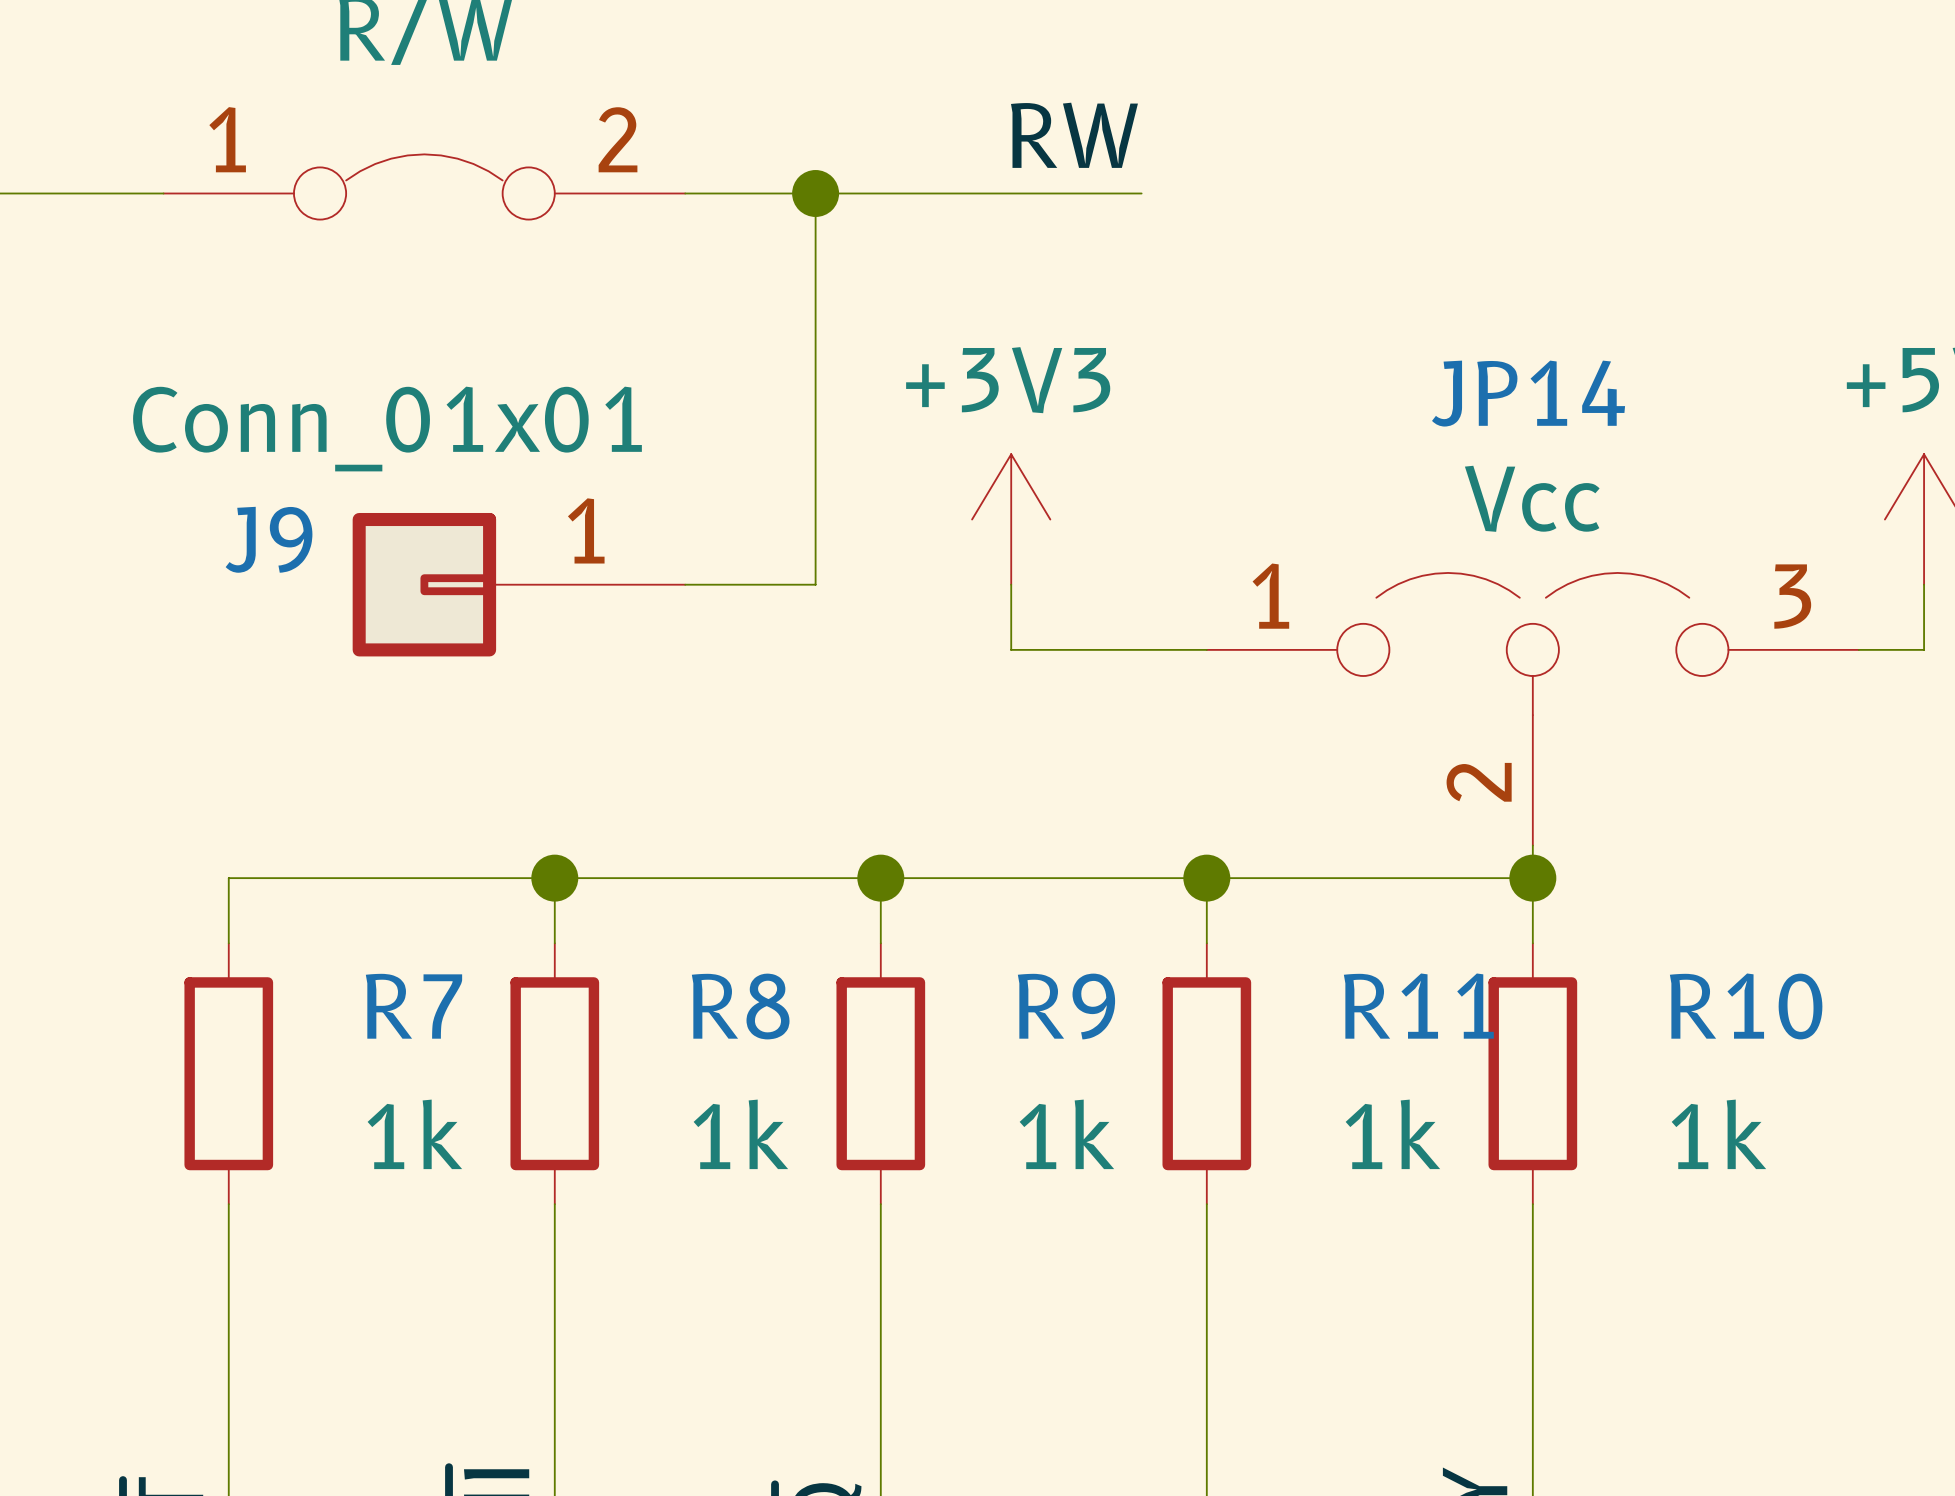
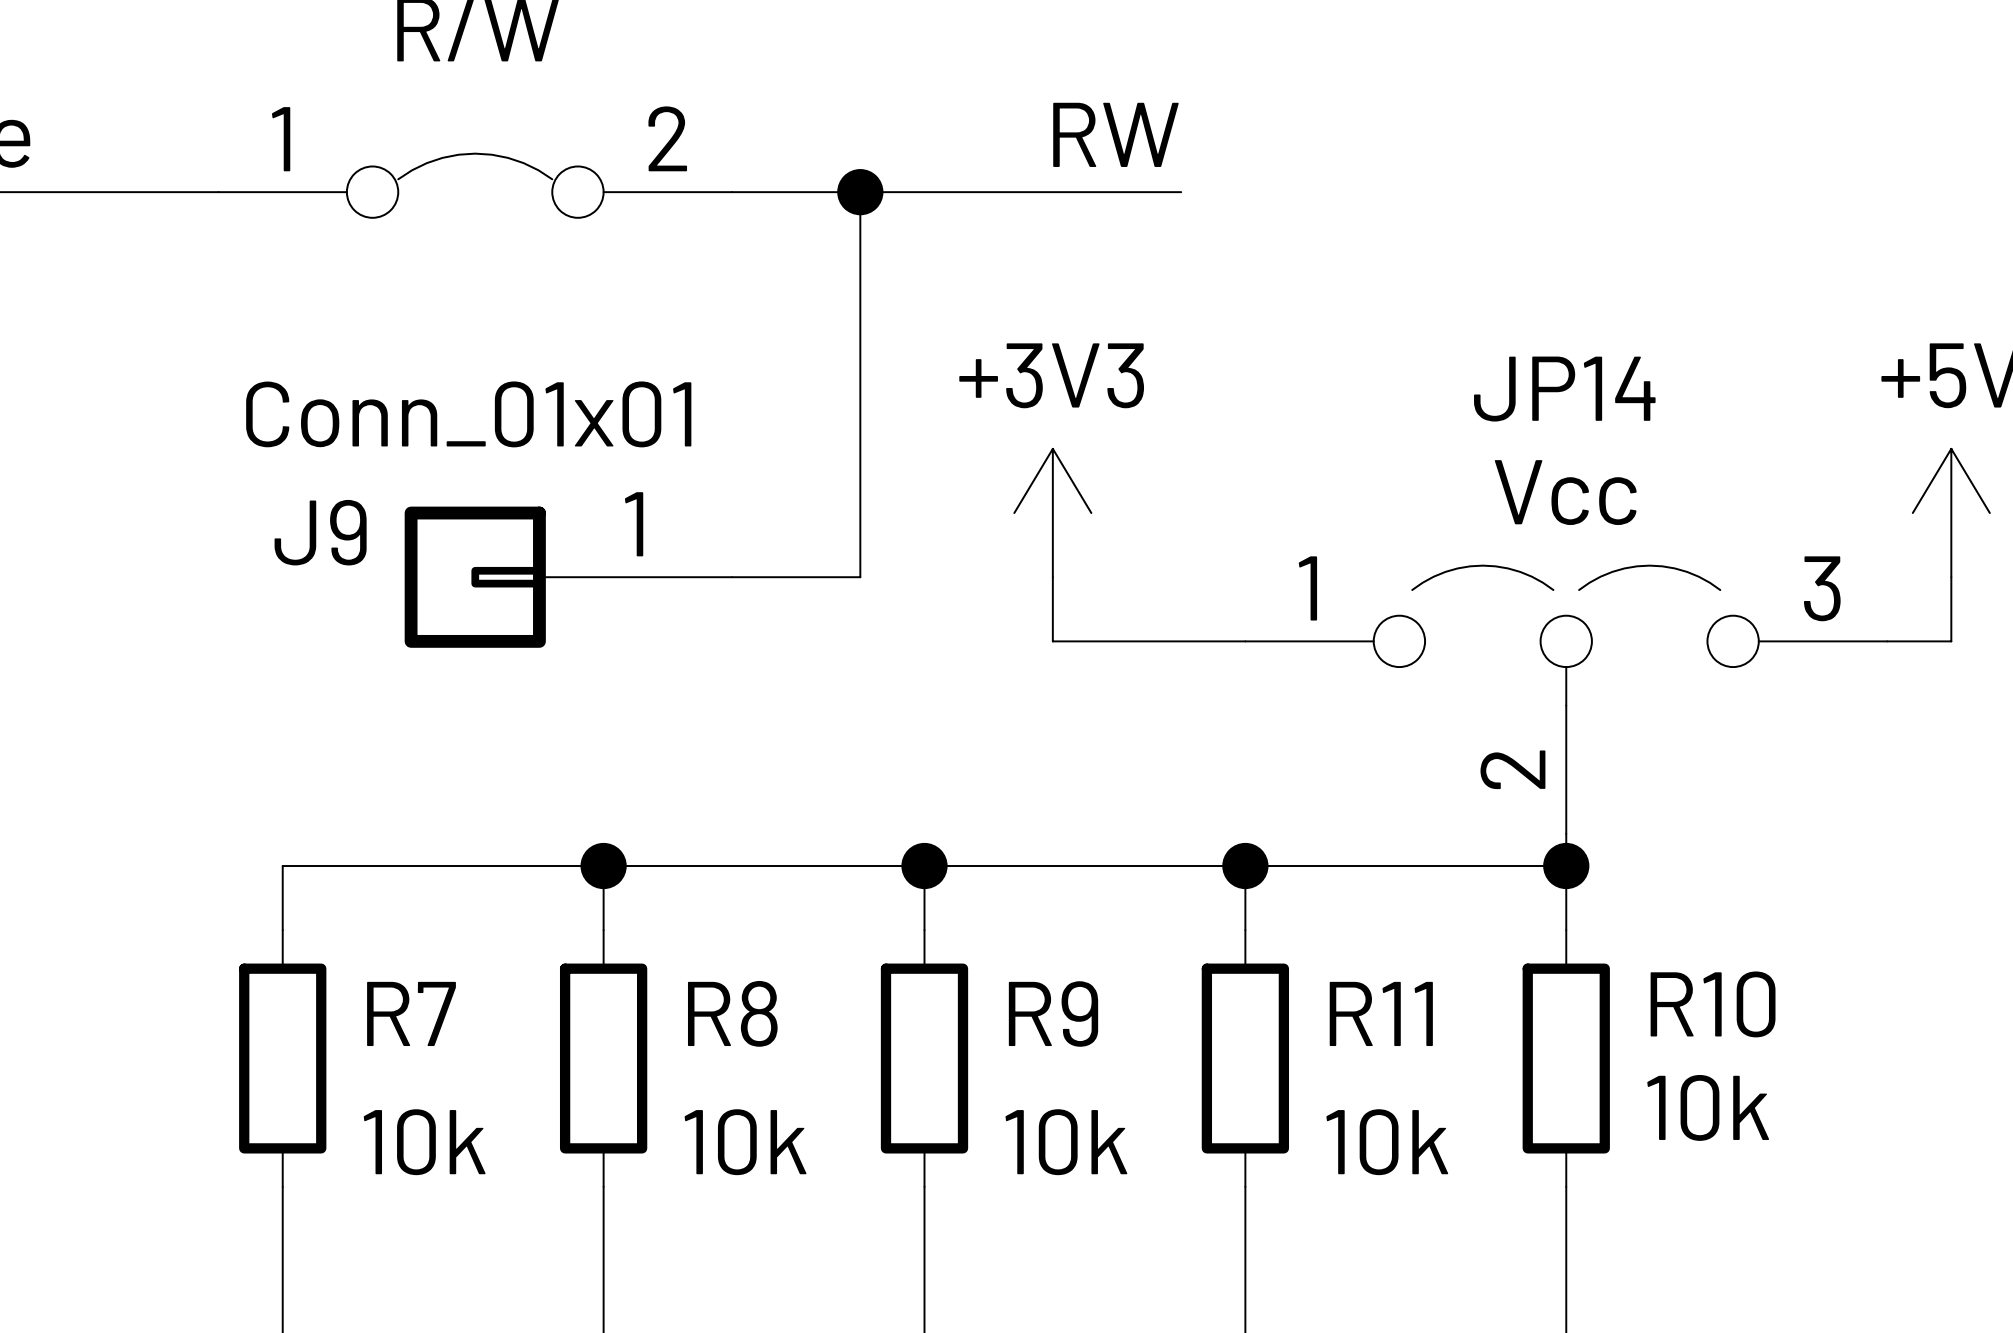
R7 name position: R7 (413, 1006) -> R7 (411, 1013)
R8 name position: R8 (740, 1006) -> R8 (732, 1013)
R9 name position: R9 (1066, 1006) -> R9 (1053, 1013)
R11 name position: R11 (1418, 1006) -> R11 (1381, 1013)
R10 name position: R10 (1746, 1006) -> R10 (1713, 1004)
R7 value: 1k (414, 1134) -> 10k (424, 1142)
R8 value: 1k (740, 1134) -> 10k (745, 1142)
R9 value: 1k (1066, 1134) -> 10k (1066, 1142)
R11 value: 1k (1392, 1134) -> 10k (1387, 1142)
R10 value: 1k (1718, 1134) -> 10k (1708, 1107)

